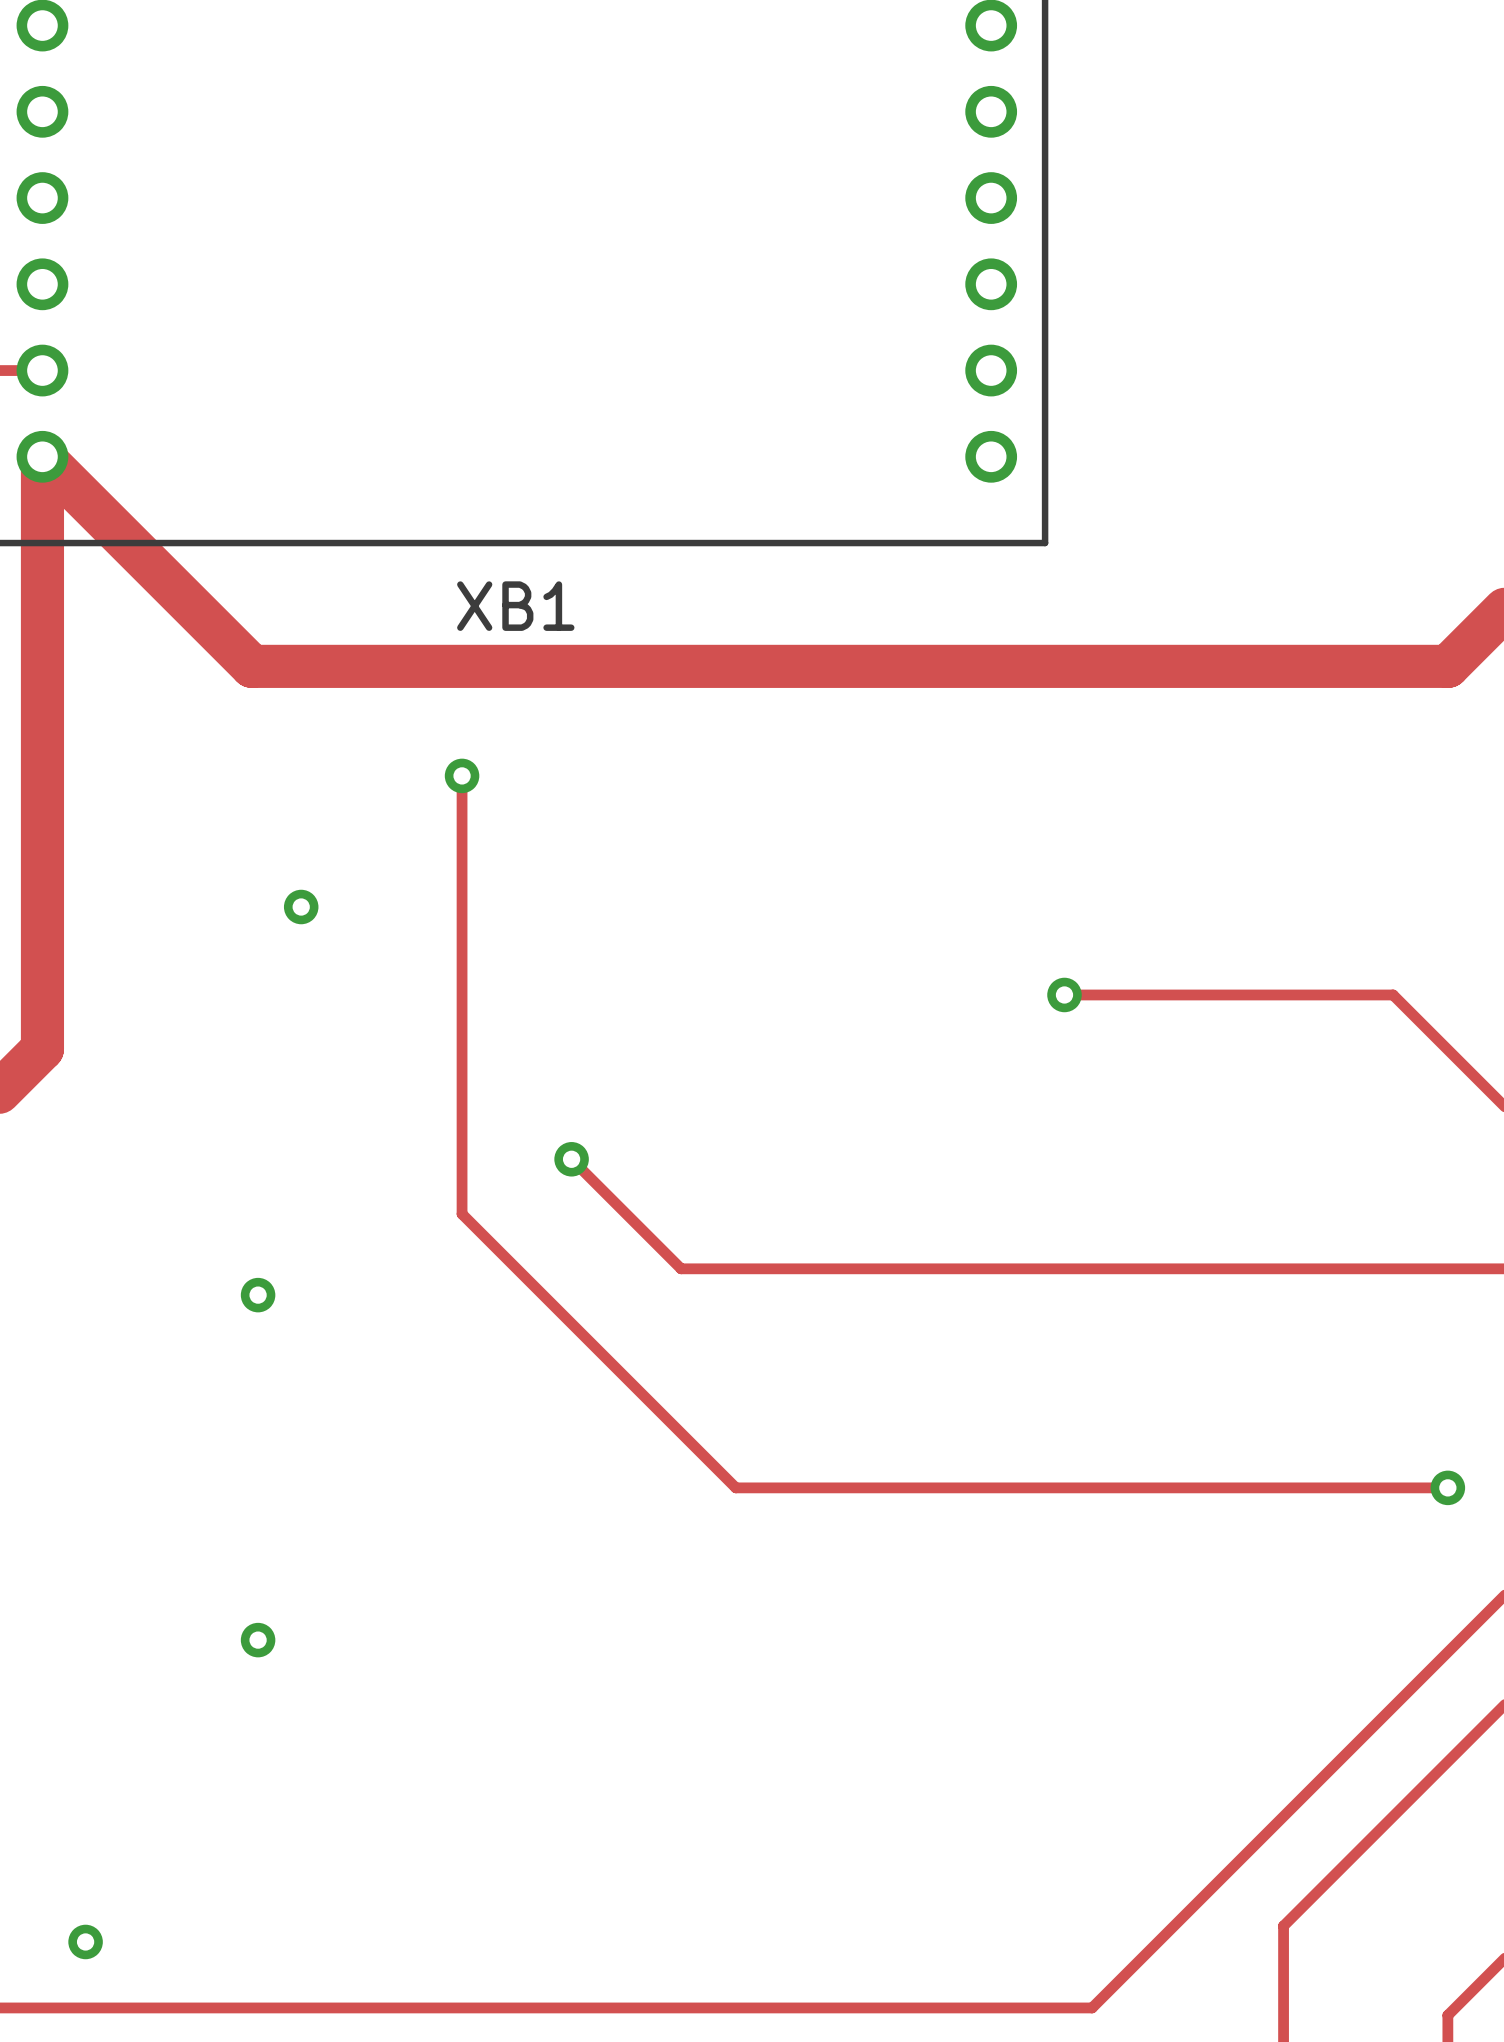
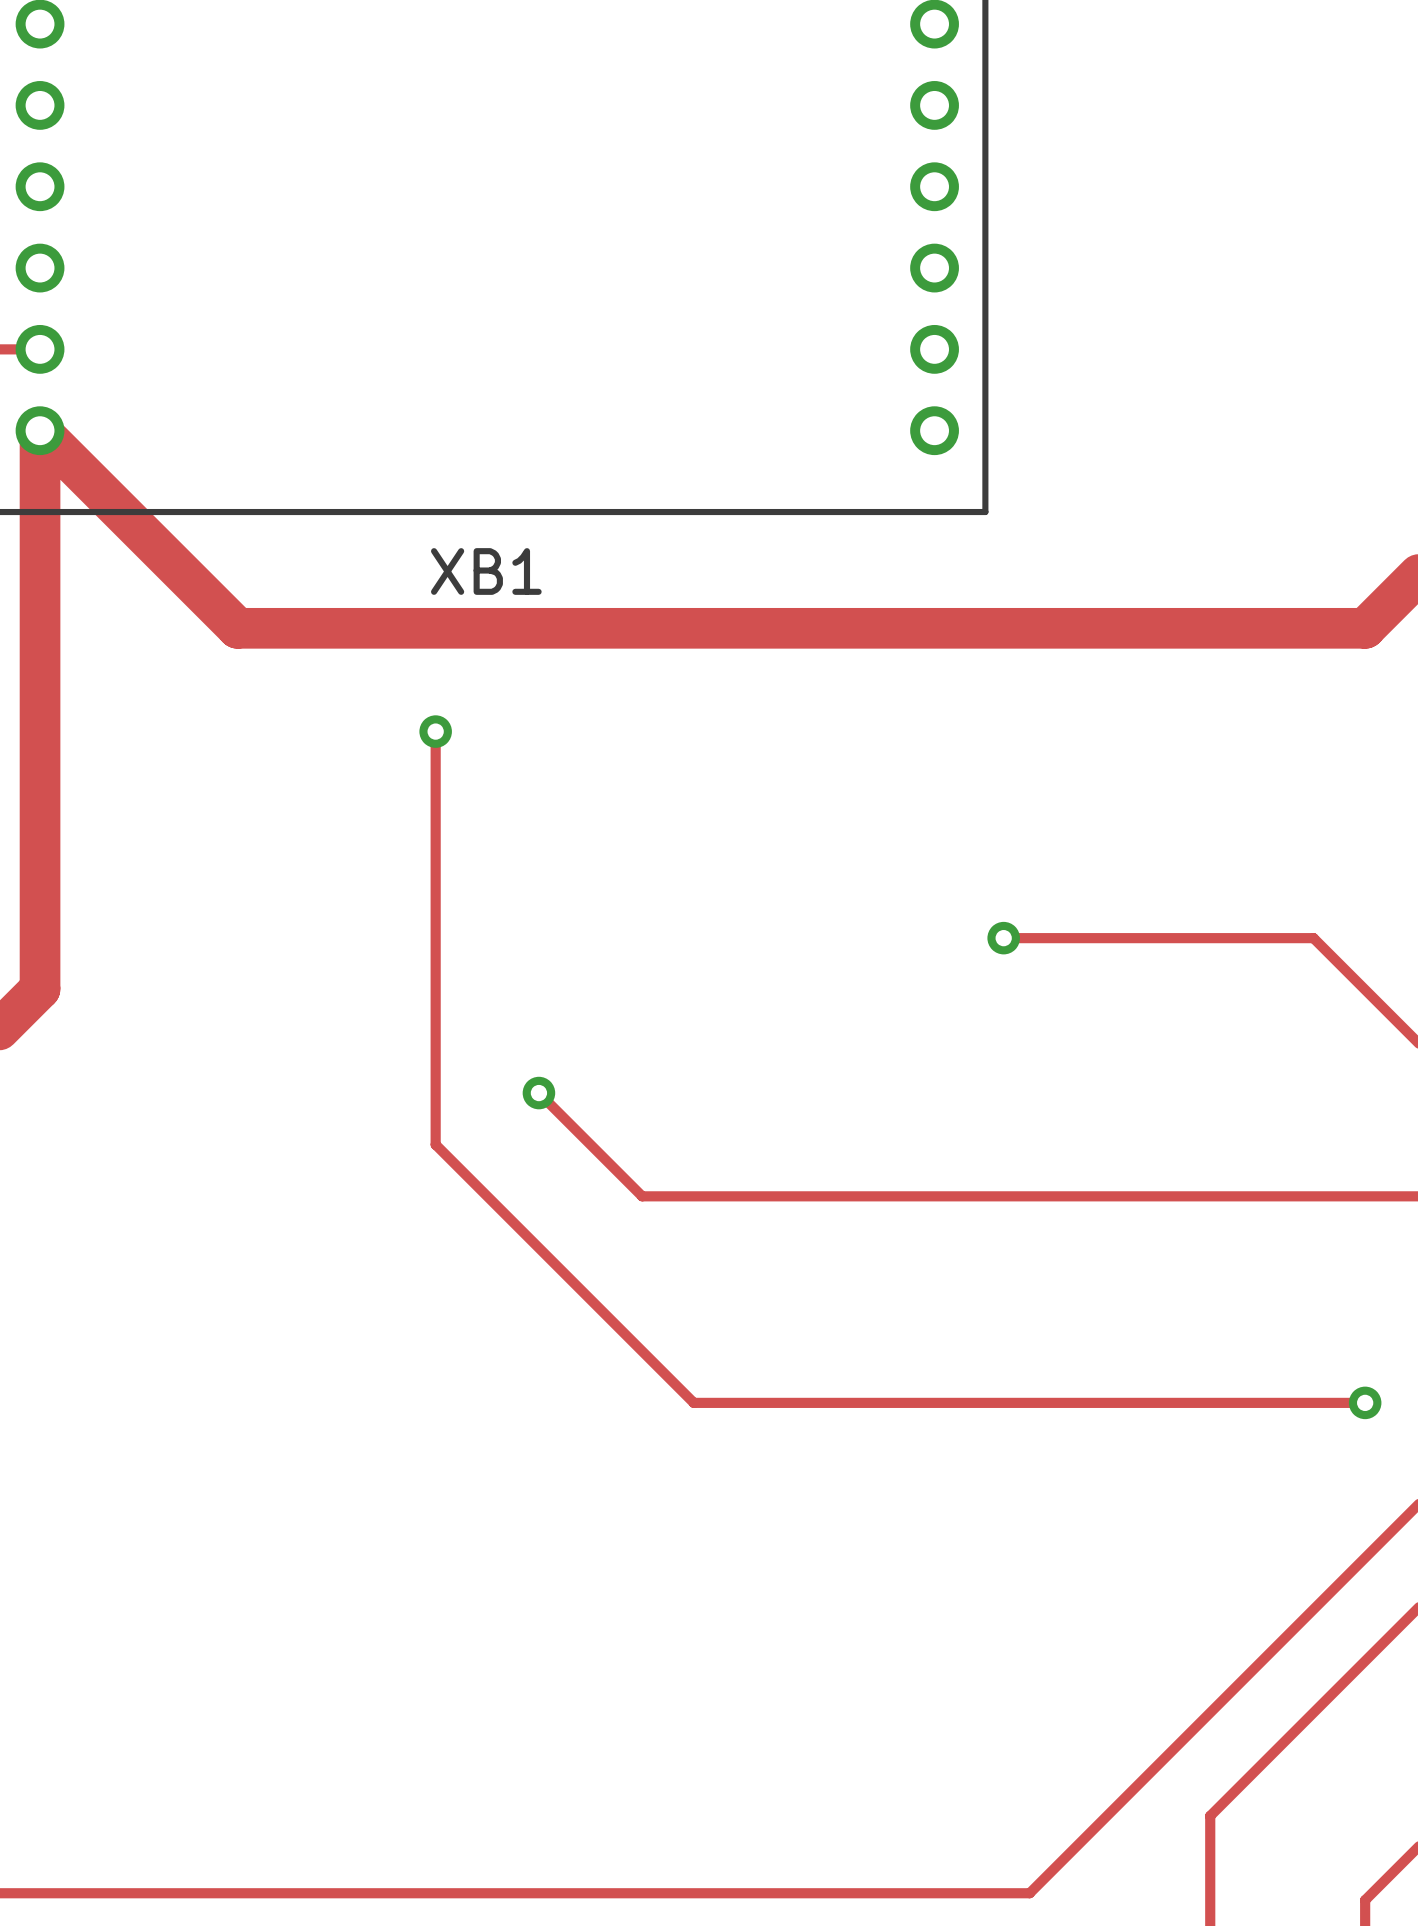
via: (301, 907) -> none
via: (258, 1295) -> none
via: (258, 1640) -> none
via: (85, 1941) -> none

